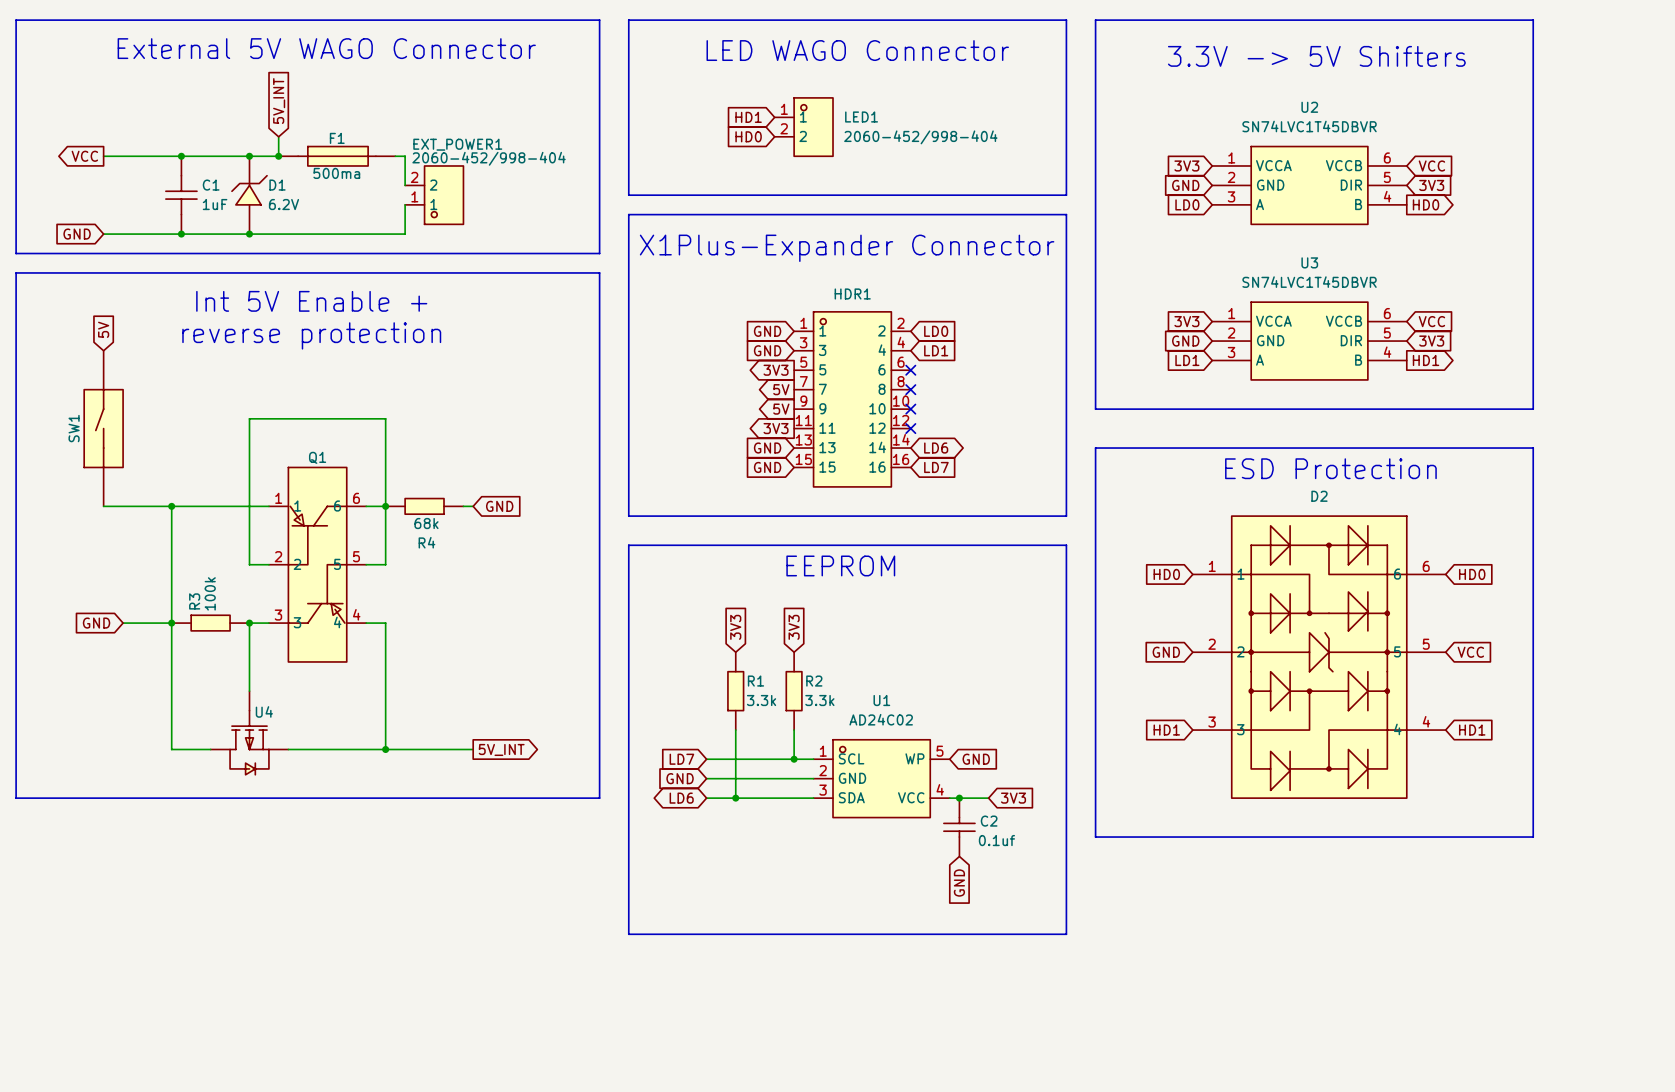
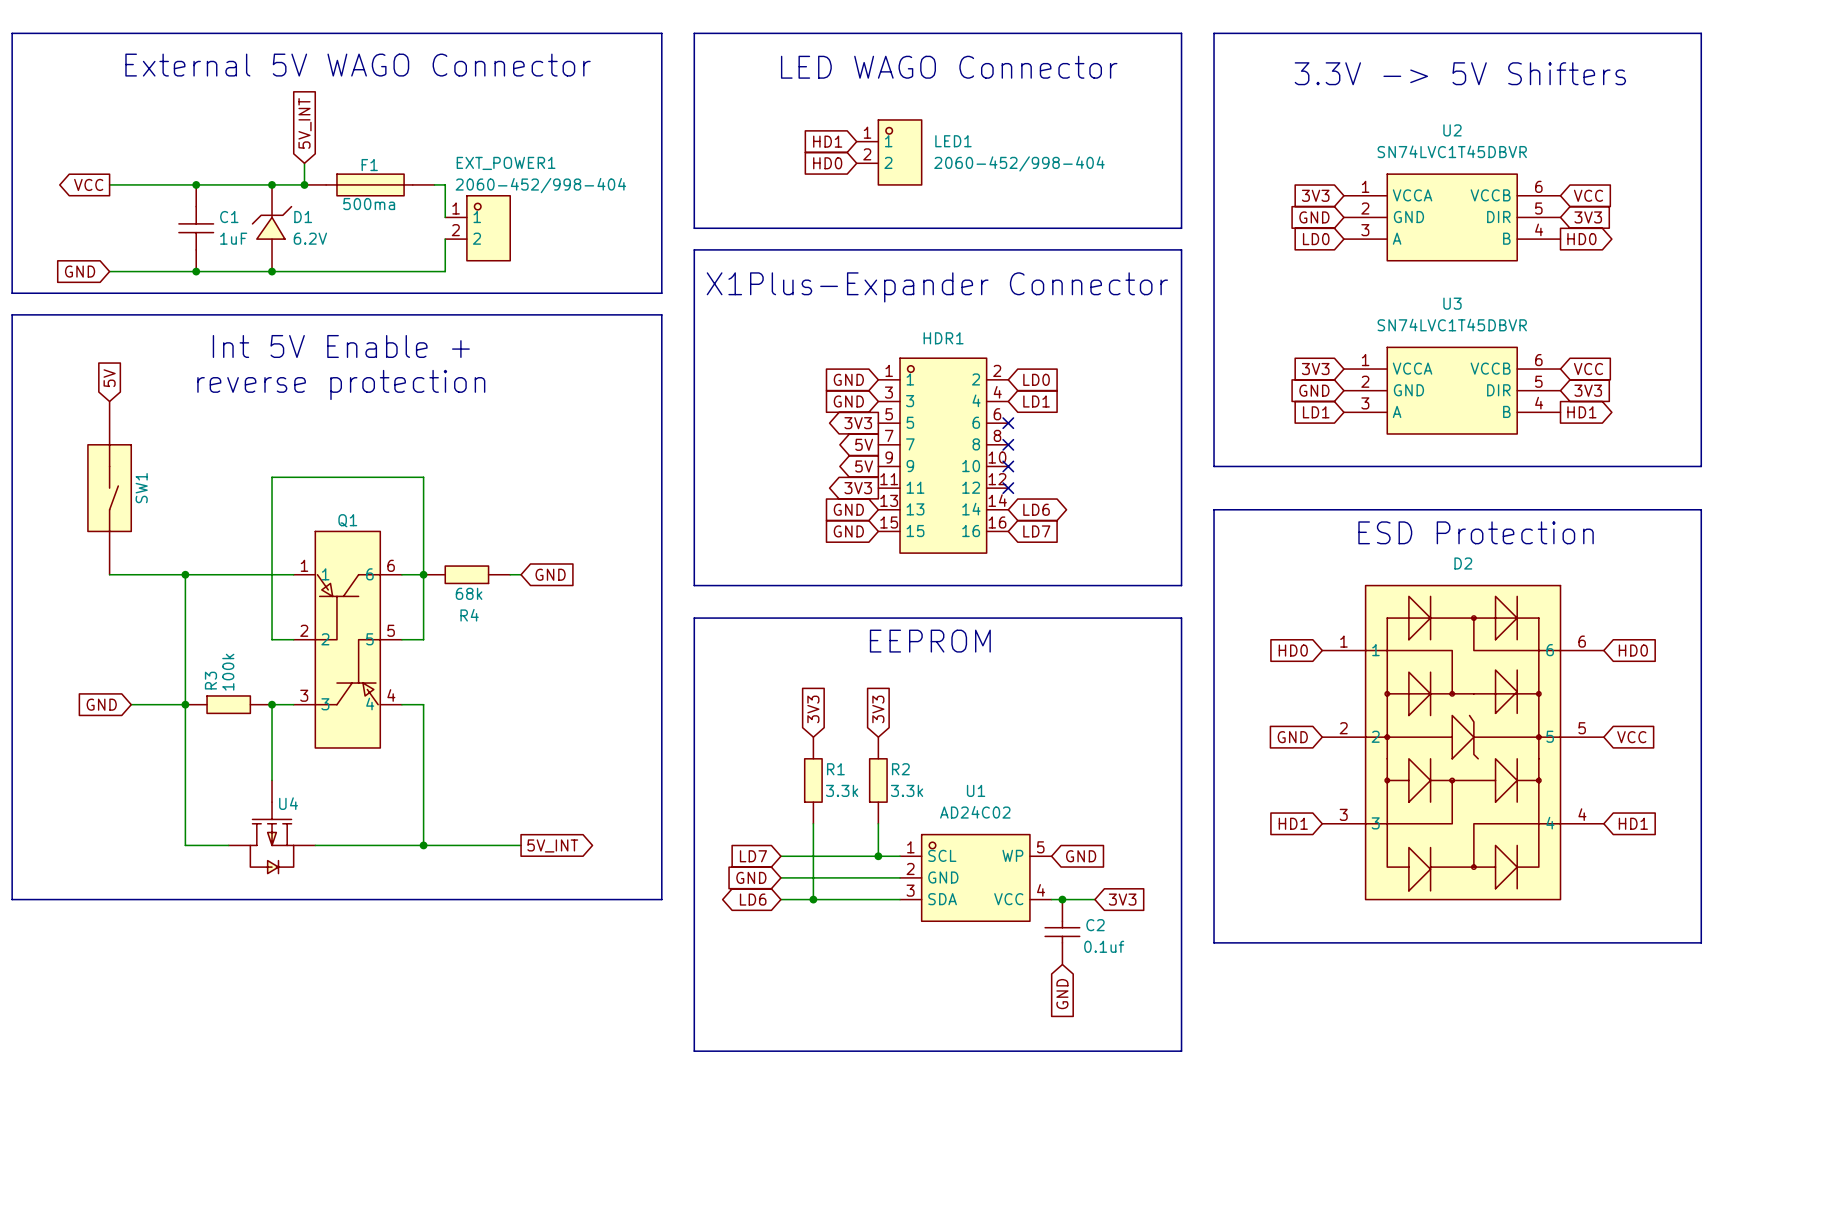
EXT_POWER1 flip: as is (444, 195) -> up-down (488, 228)
SW1 rotation: 0° (103, 428) -> 180° (109, 488)

